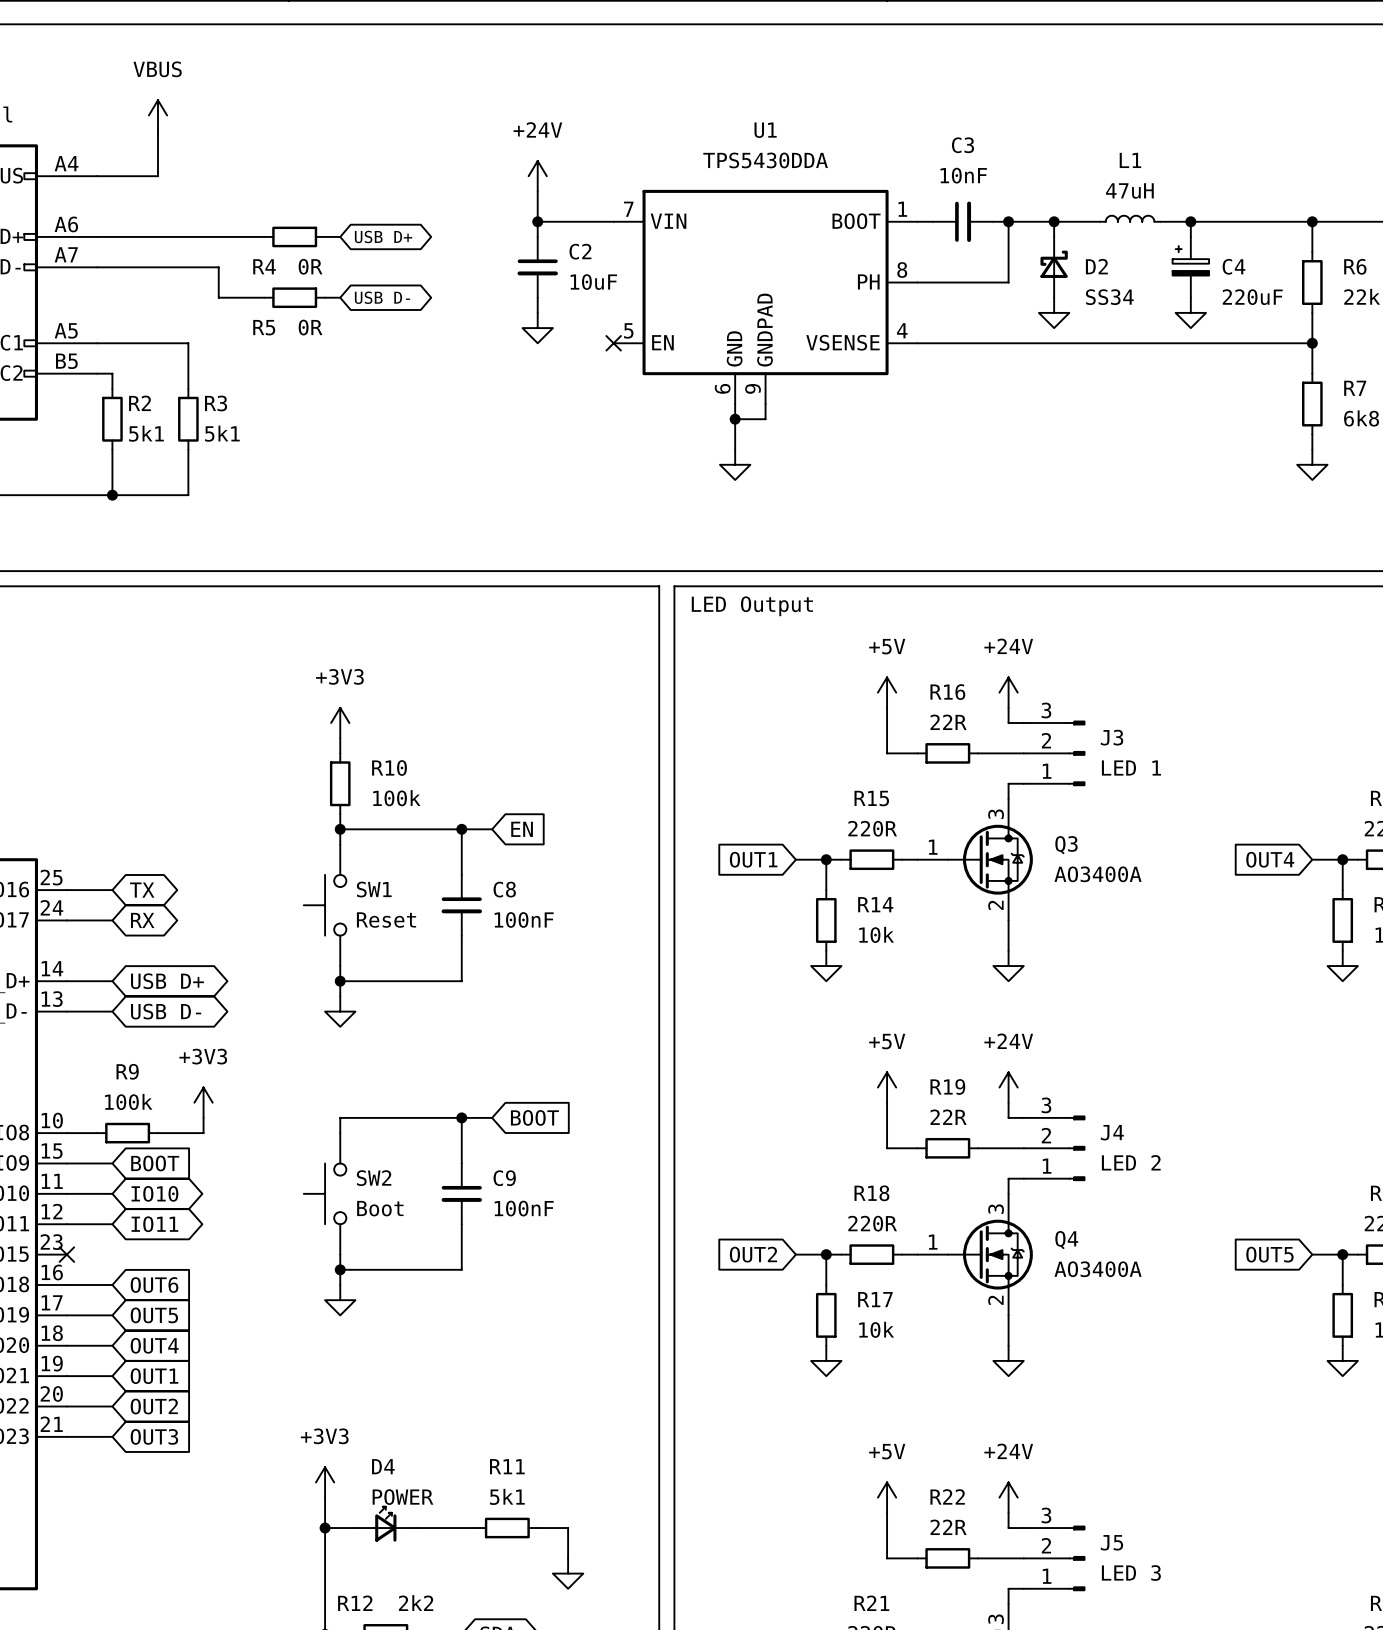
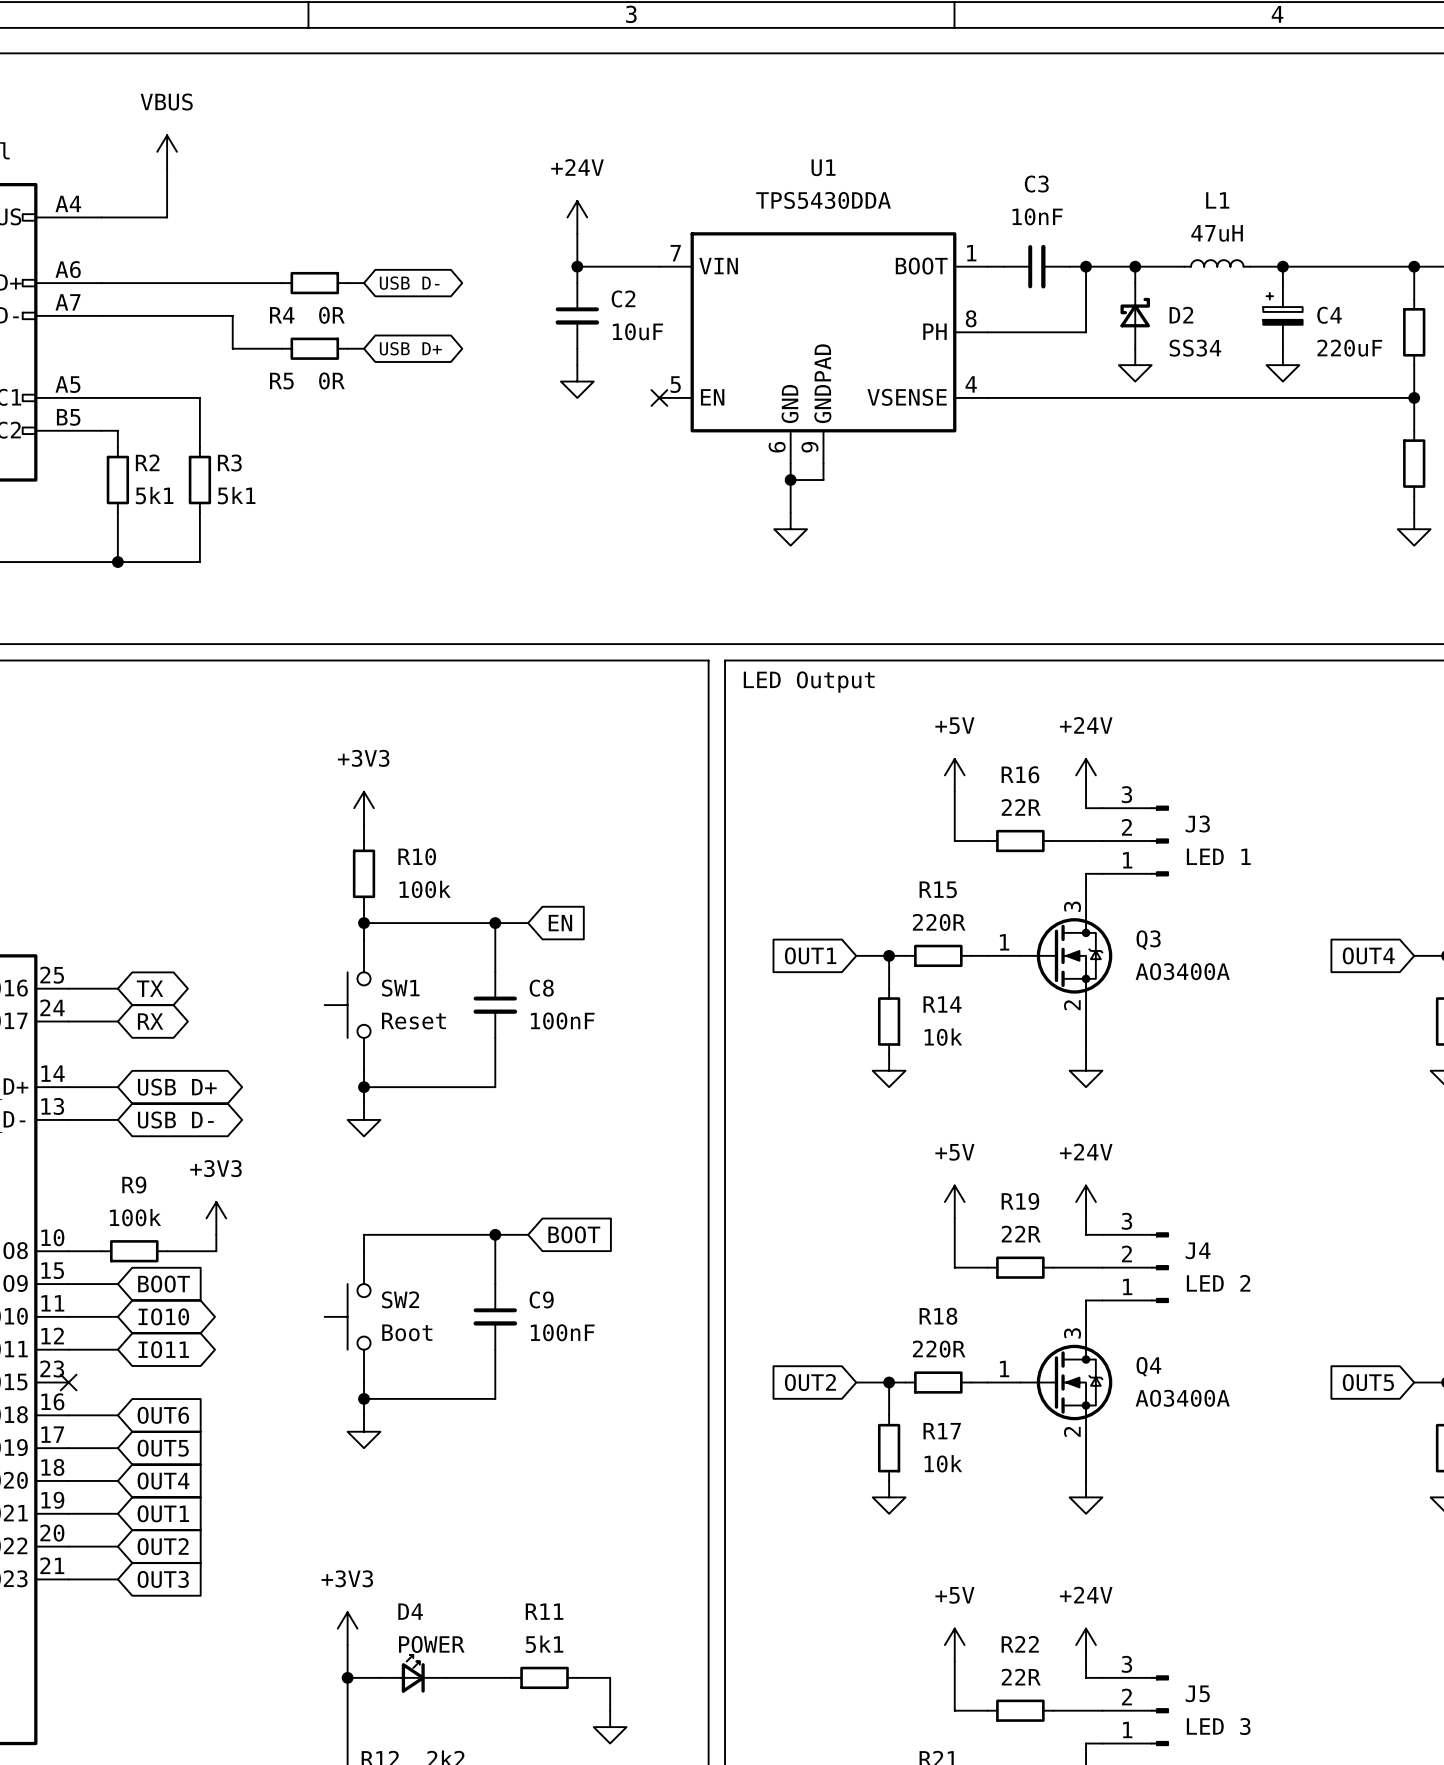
global label: USB D+ (383, 236) -> USB D- (409, 283)
global label: USB D- (382, 297) -> USB D+ (410, 348)

